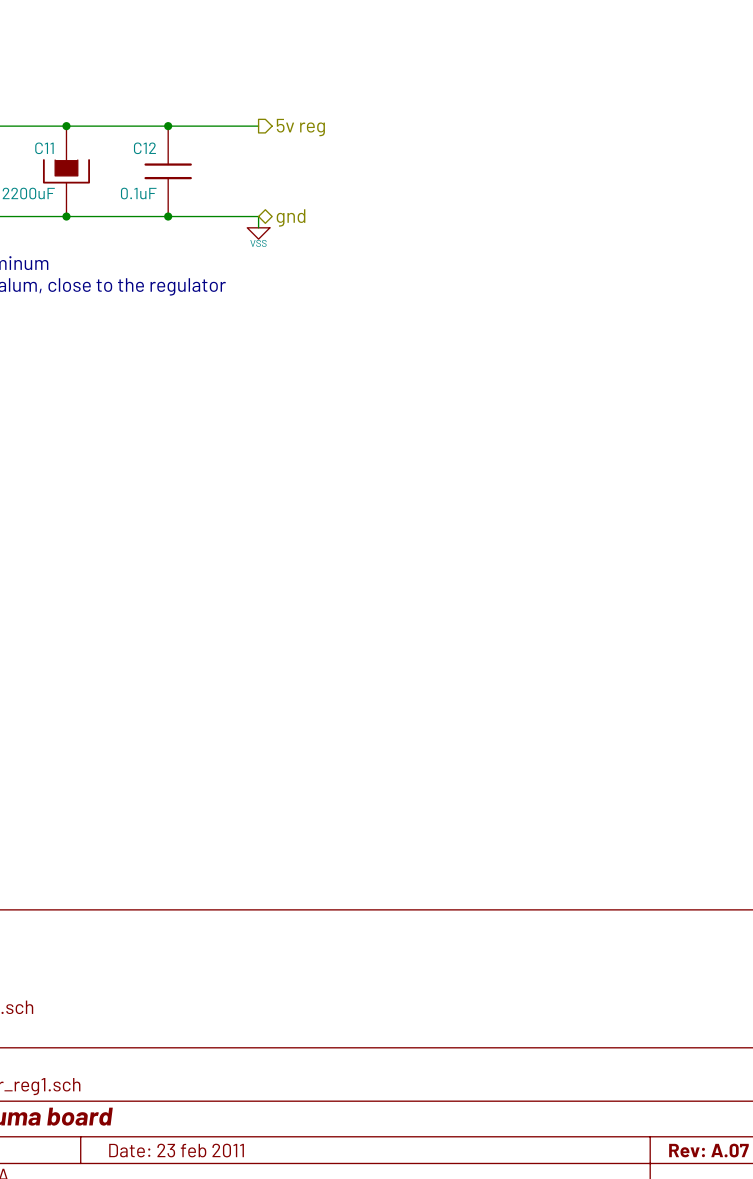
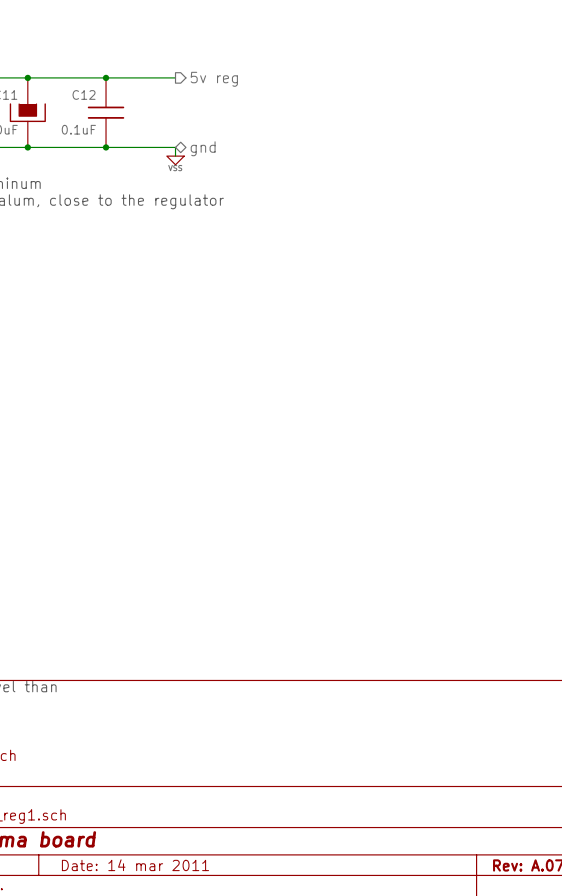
title block: Date: 23 feb 2011 (176, 1150) -> Date: 14 mar 2011 (135, 865)

